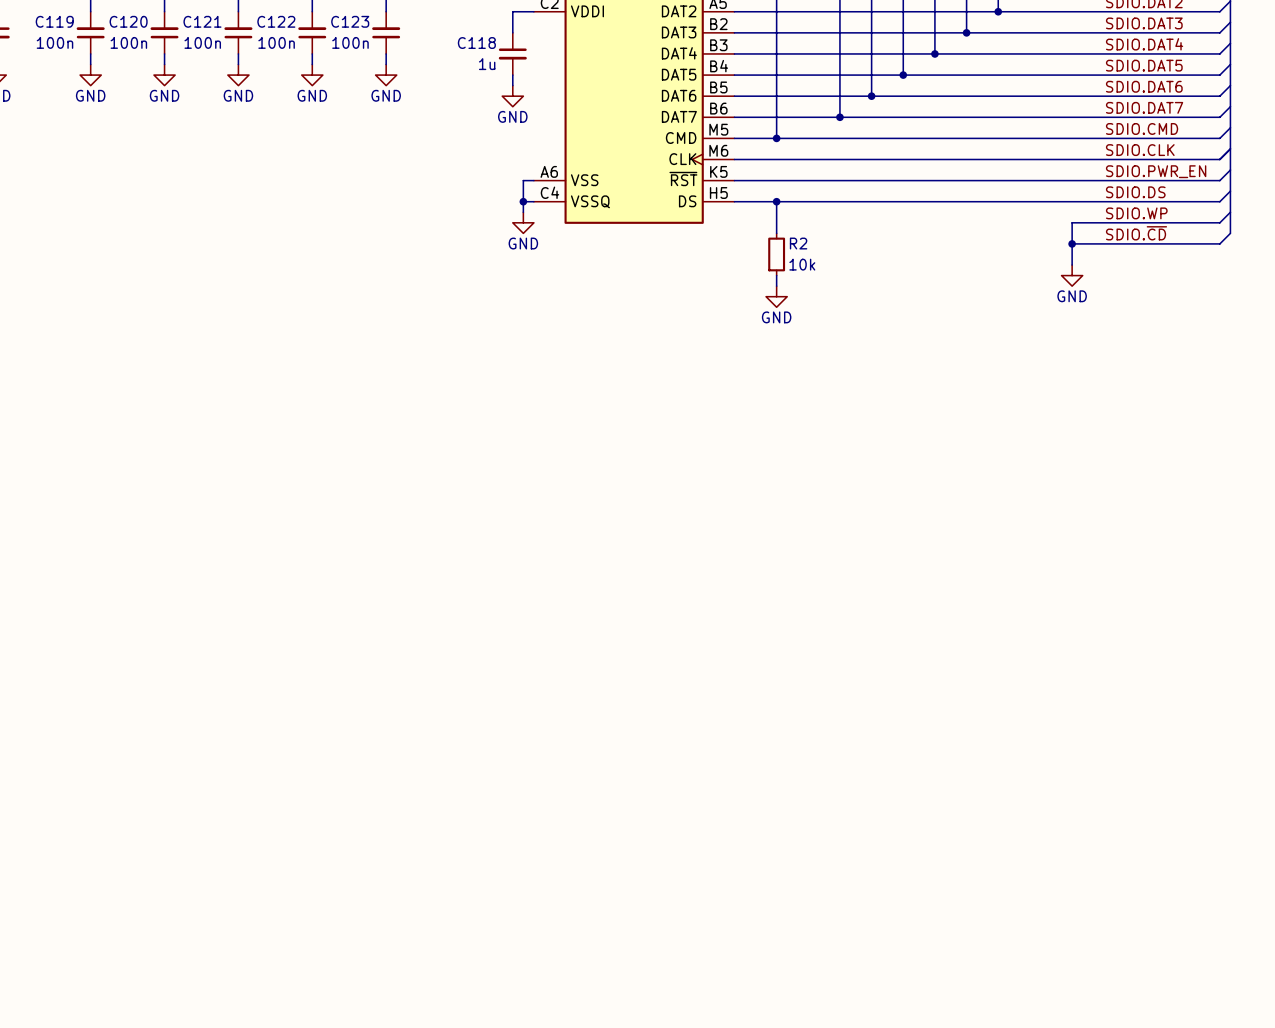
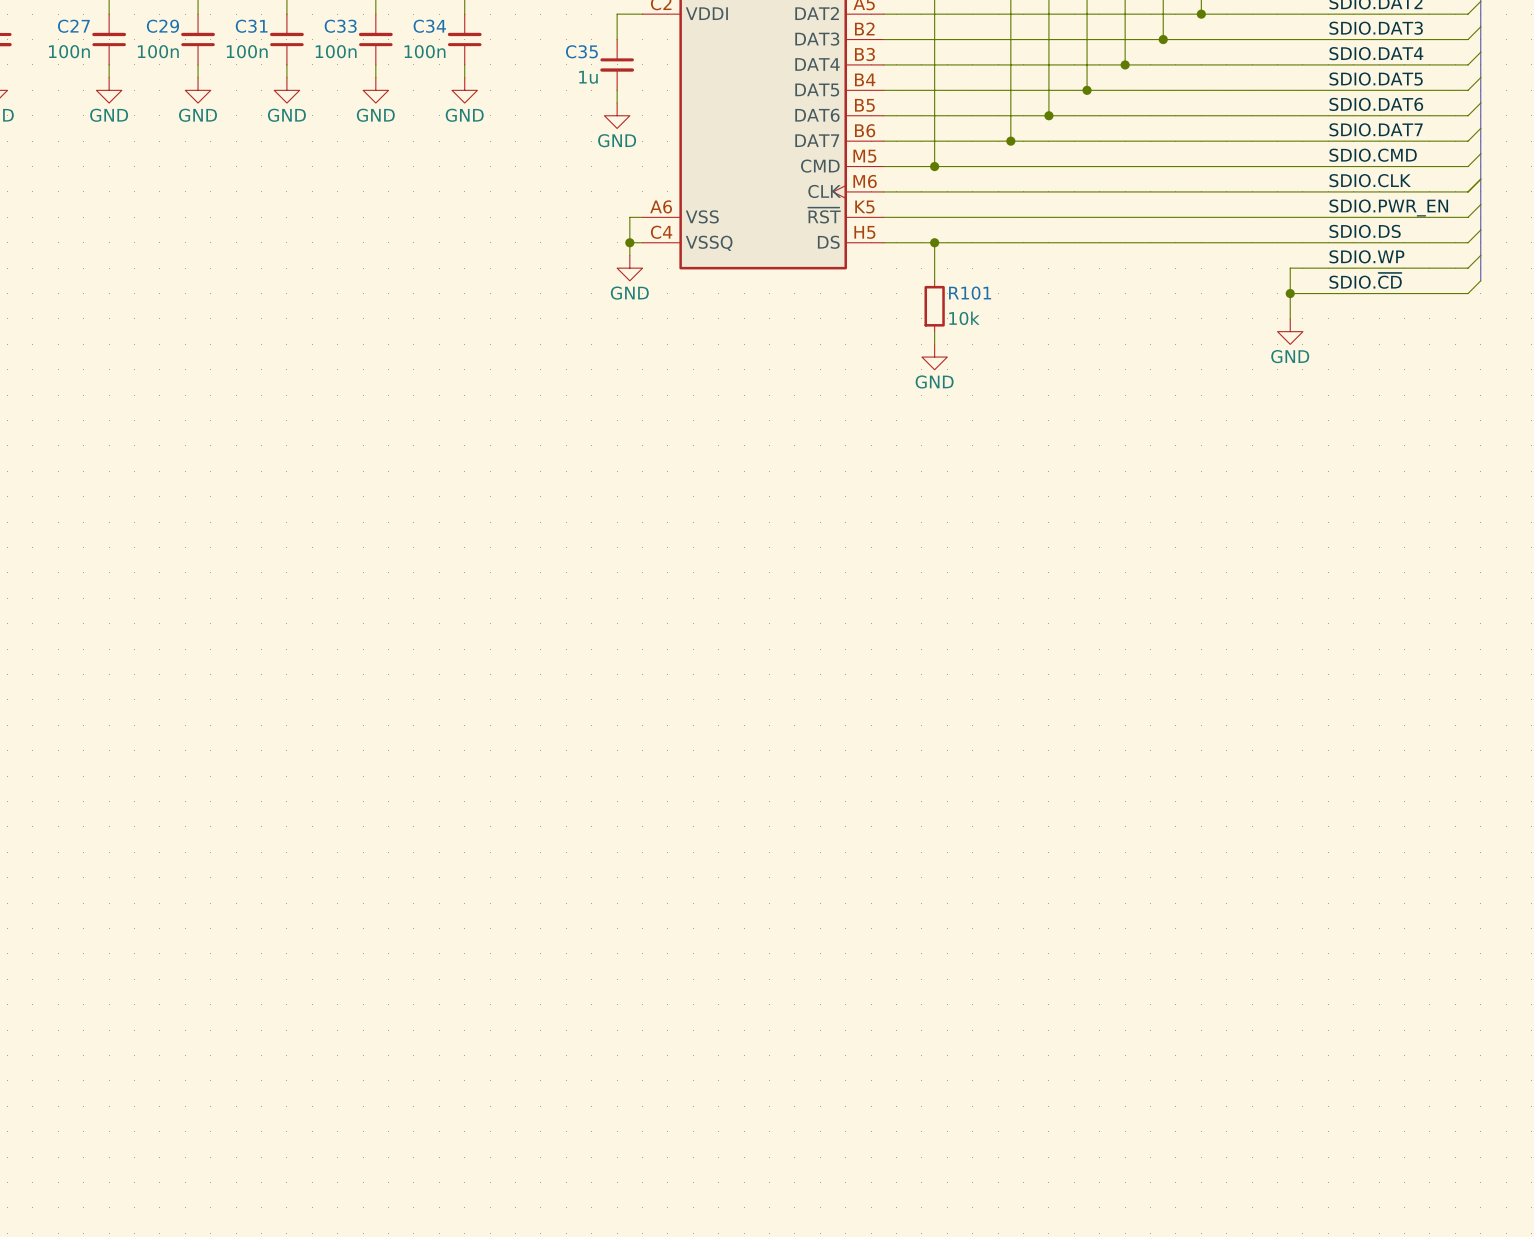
C119 name: C119 (54, 21) -> C27 (73, 26)
C120 name: C120 (128, 21) -> C29 (162, 26)
C121 name: C121 (202, 21) -> C31 (251, 26)
C122 name: C122 (276, 21) -> C33 (340, 26)
C123 name: C123 (350, 21) -> C34 (429, 26)
C118 name: C118 (476, 43) -> C35 (581, 51)
R2 name: R2 (798, 243) -> R101 (970, 293)

